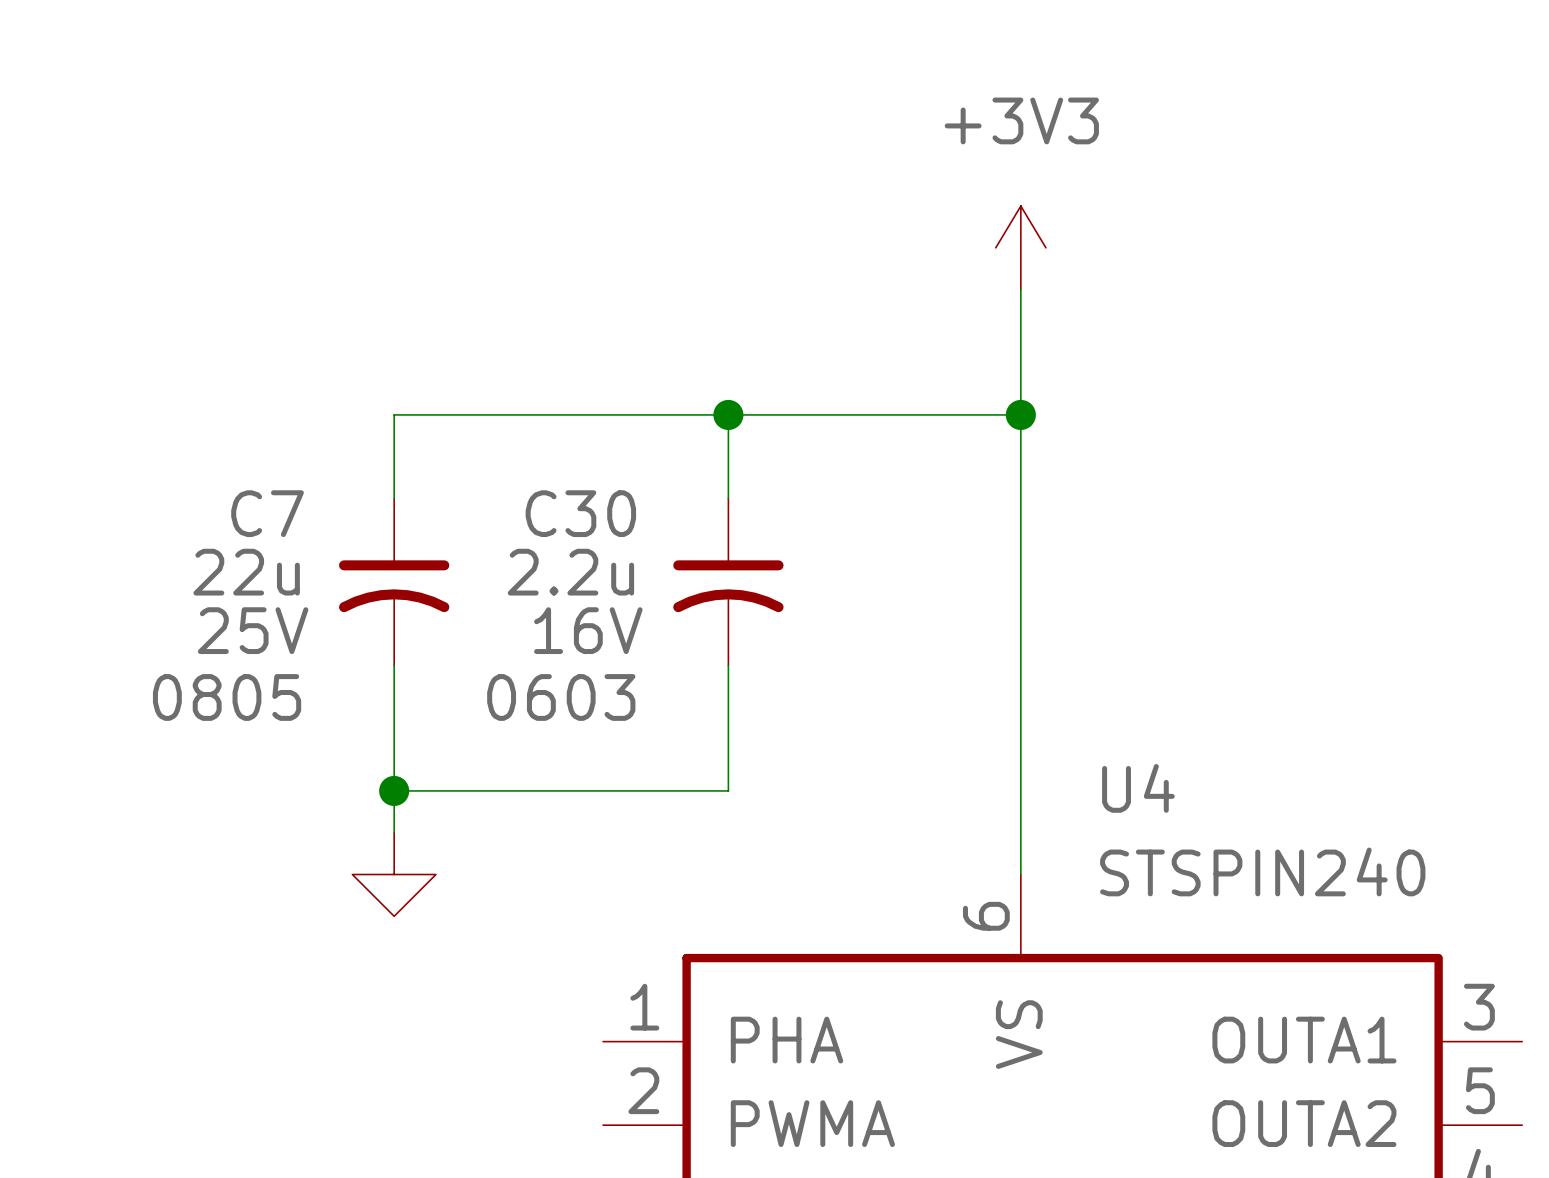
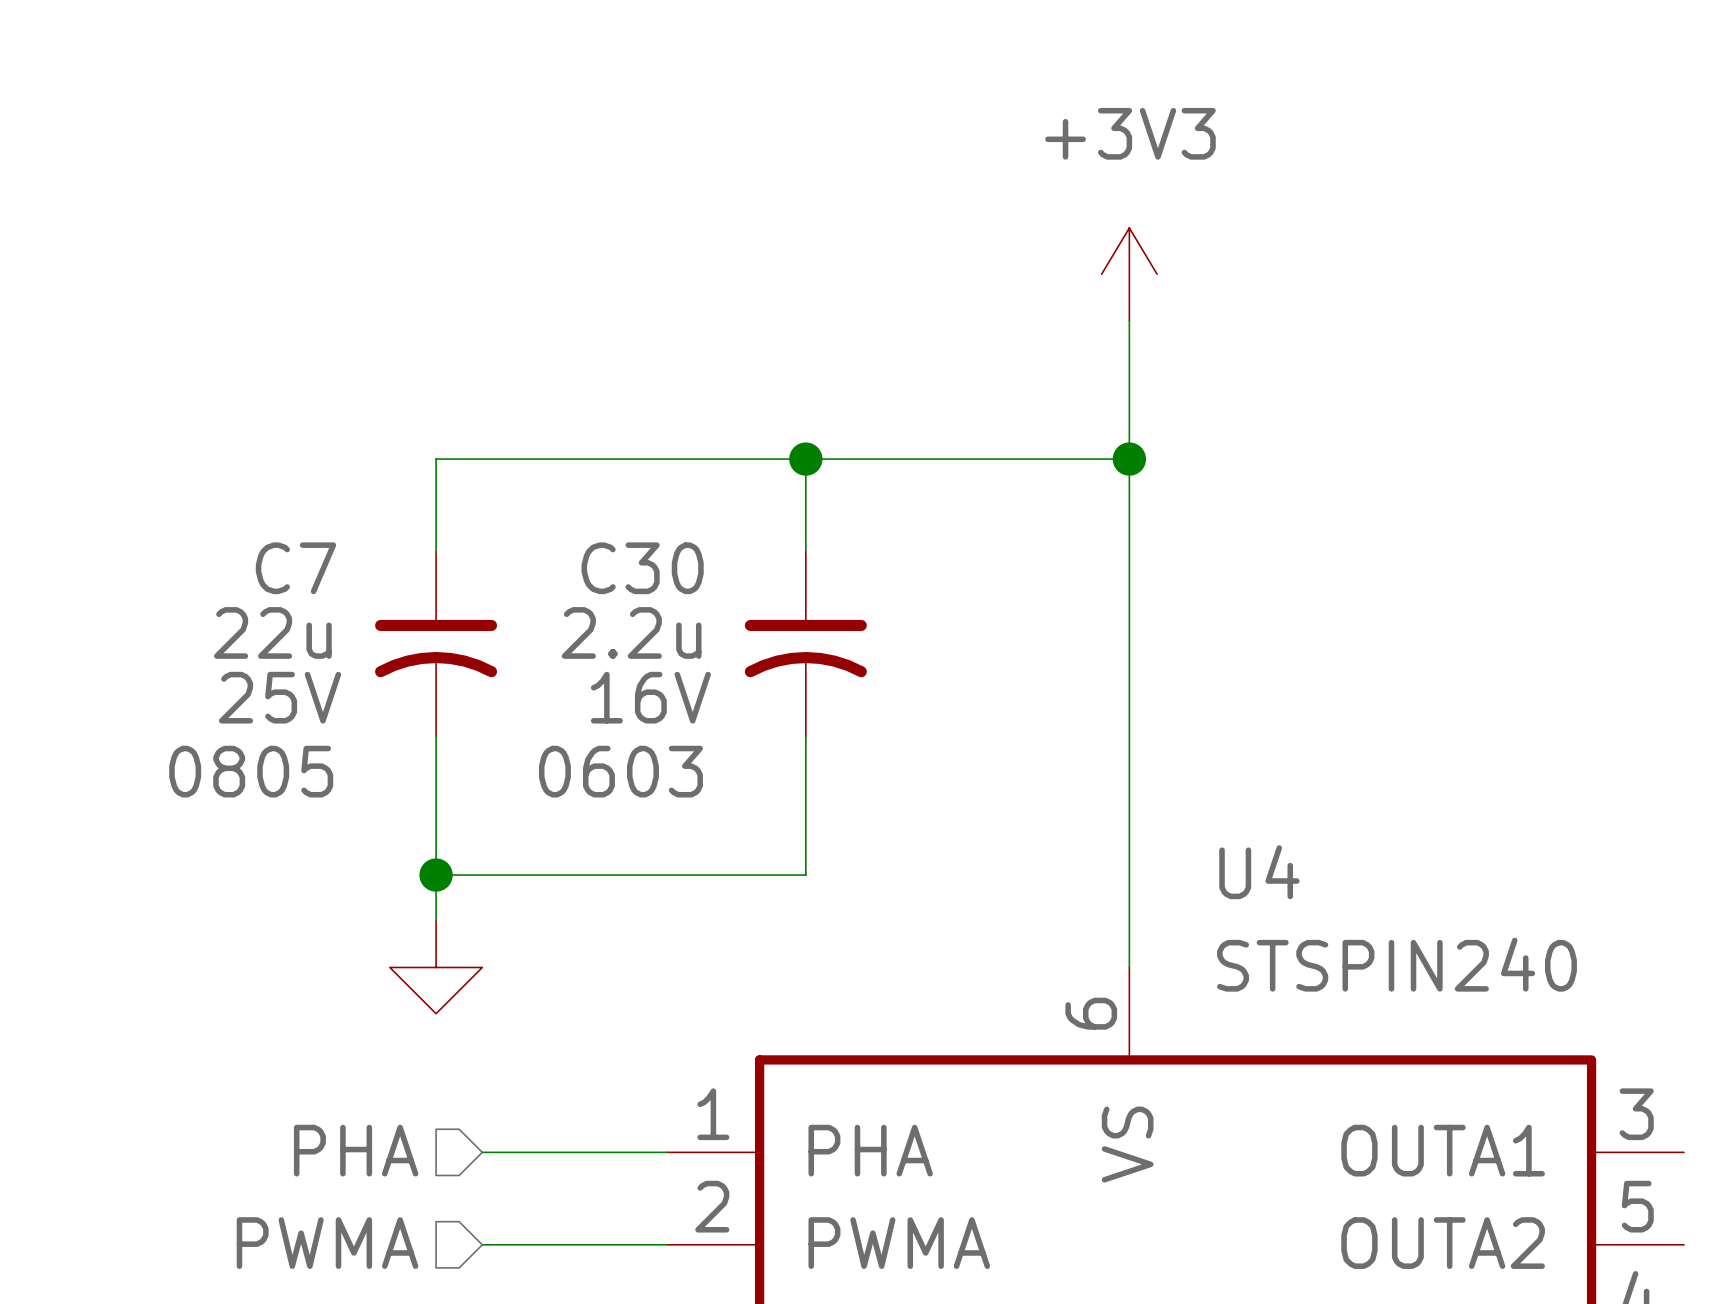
hierarchical label: none -> PHA (356, 1150)
wire: none -> (482, 1152) (667, 1152)
hierarchical label: none -> PWMA (327, 1243)
wire: none -> (482, 1244) (667, 1244)

